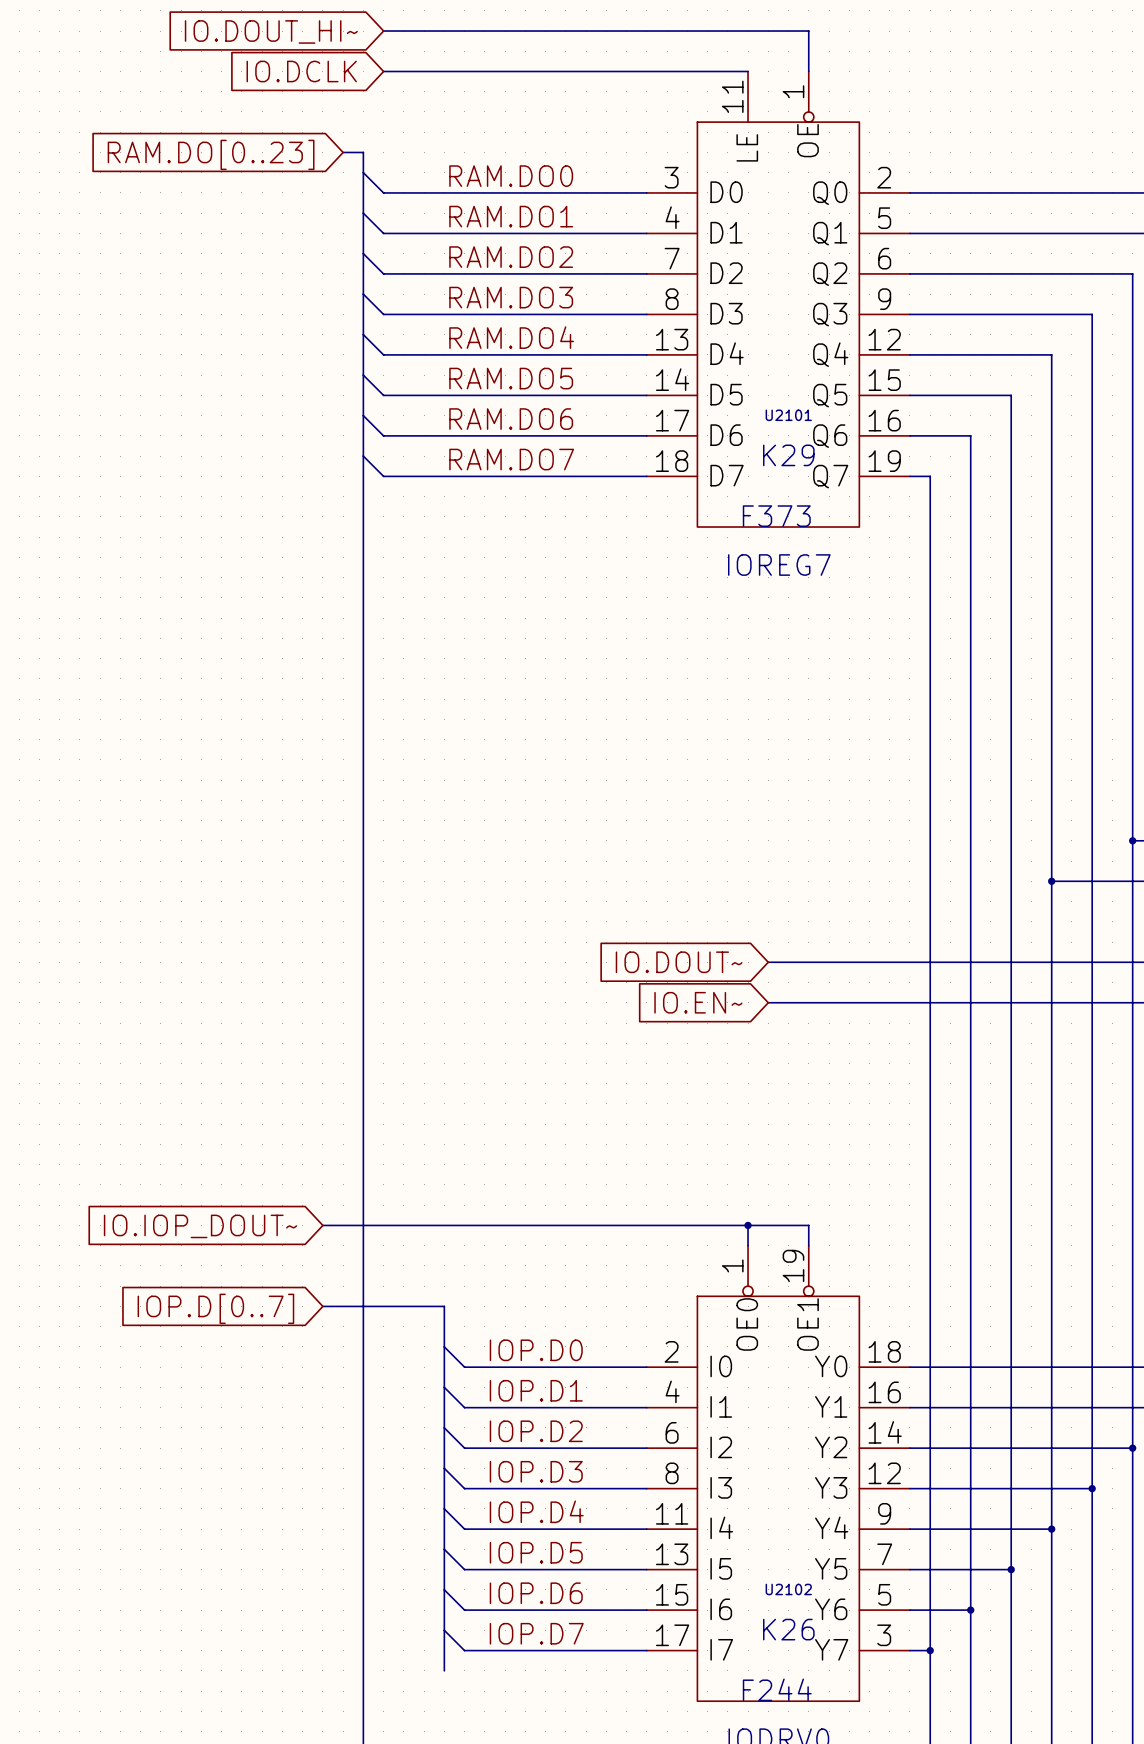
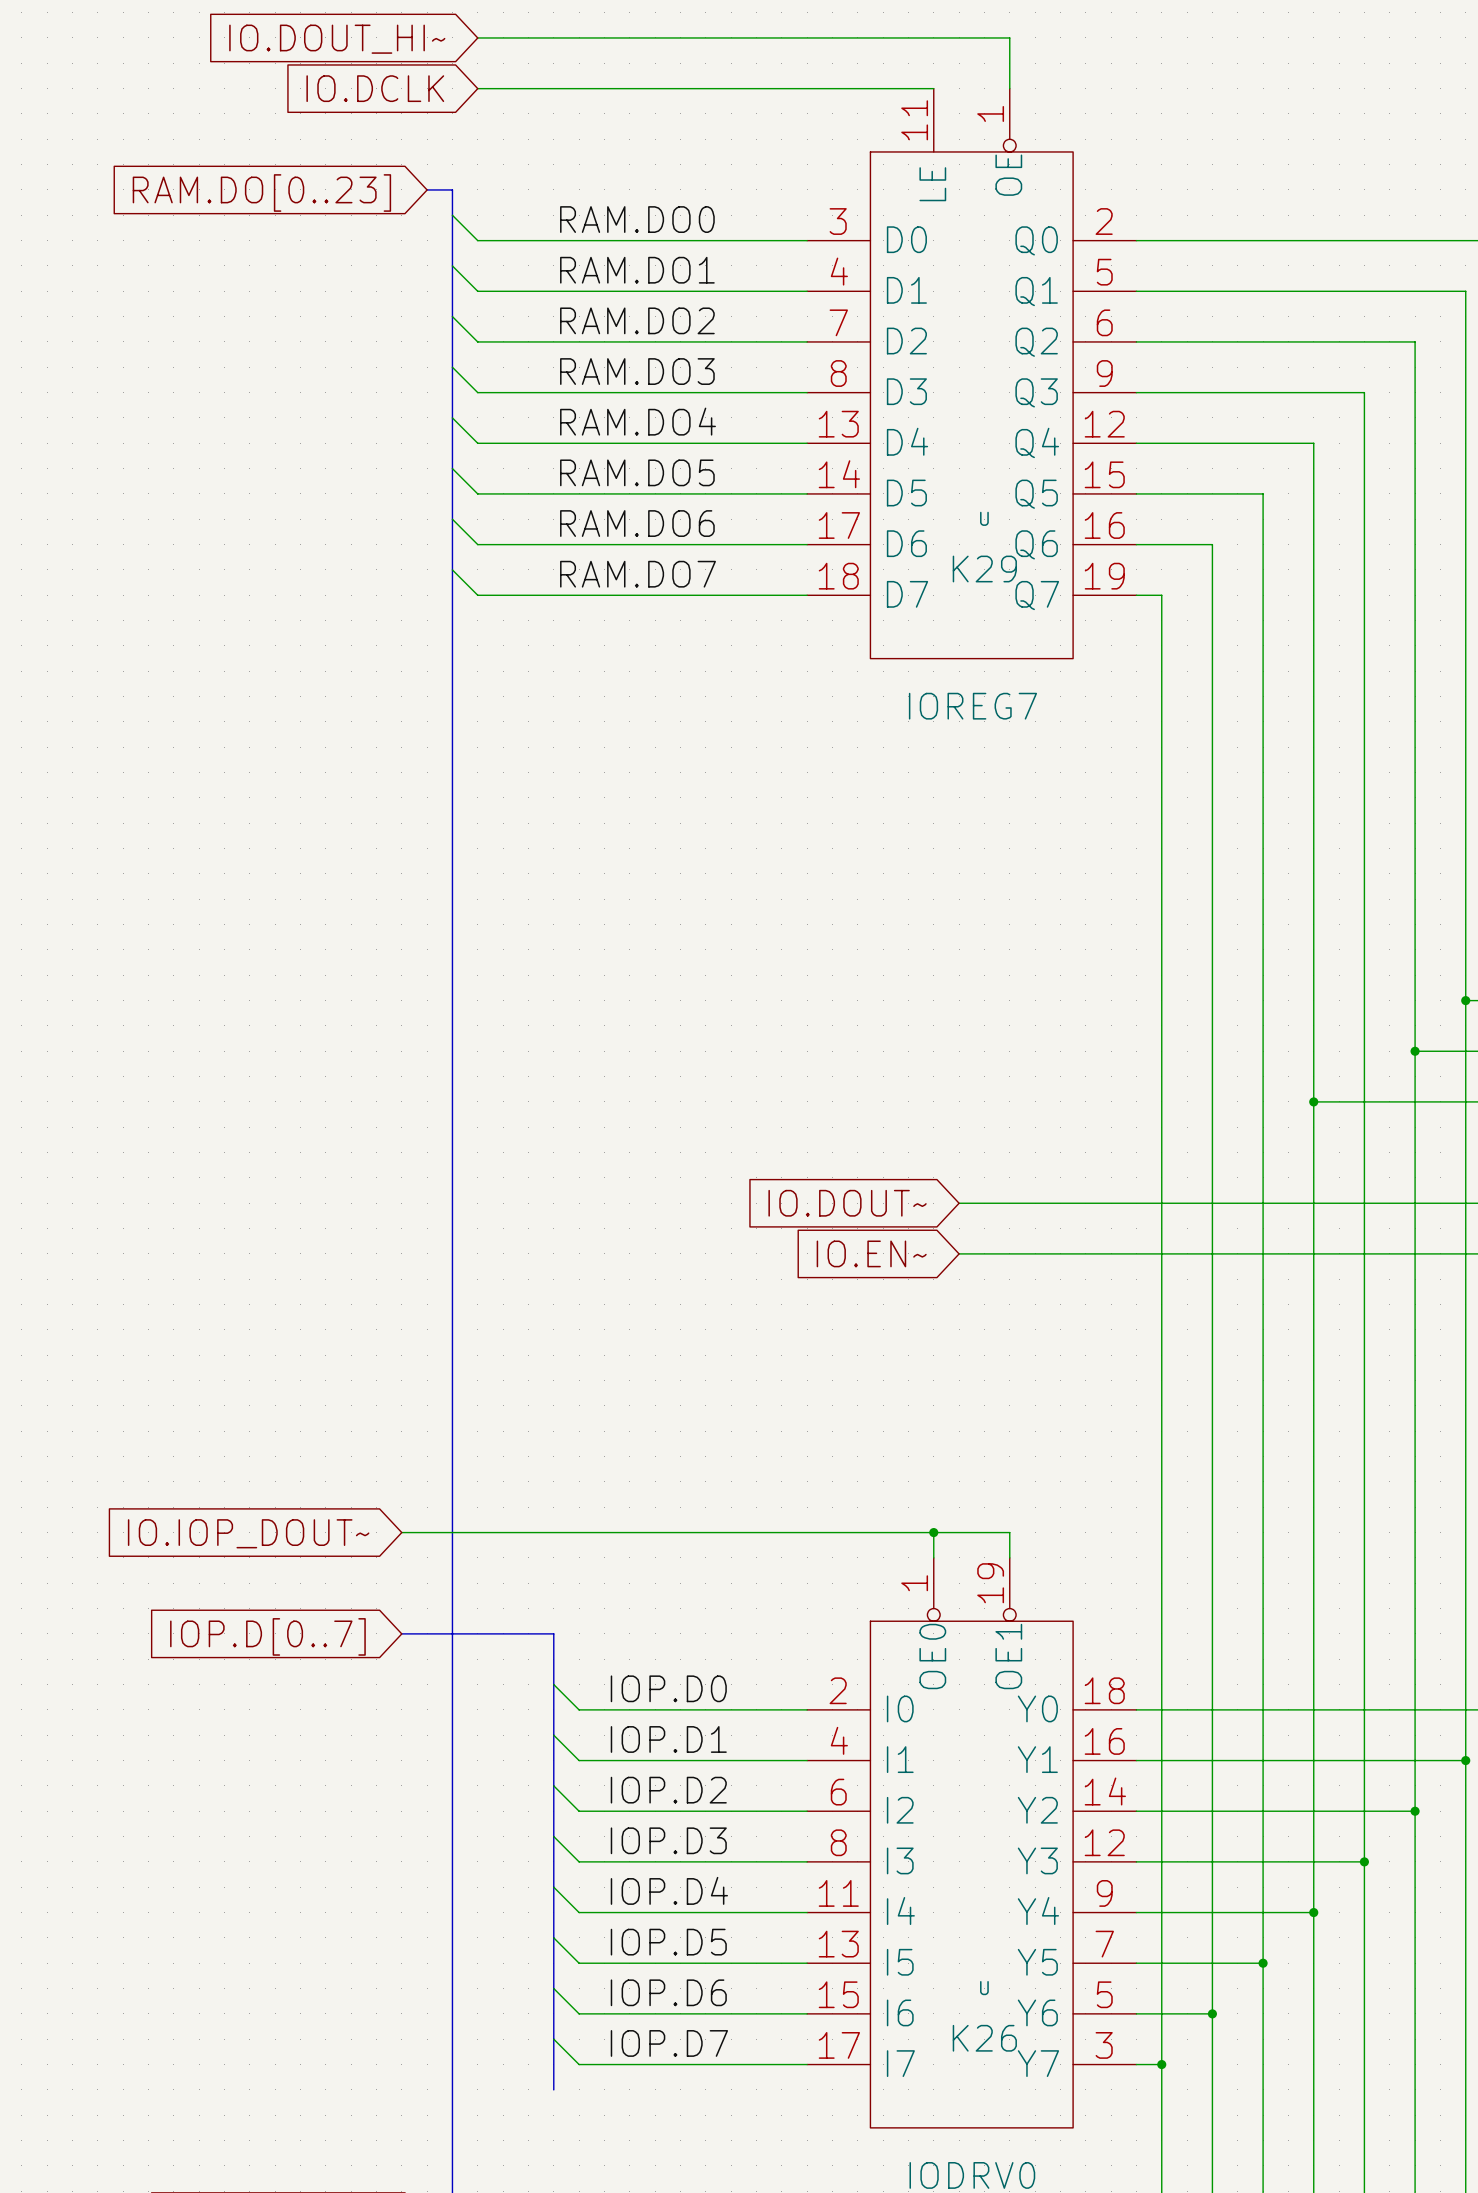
U2101 name: U2101 (788, 415) -> U (984, 518)
U2101 value: F373 (776, 516) -> none
U2102 name: U2102 (788, 1589) -> U (984, 1988)
U2102 value: F244 (777, 1689) -> none

